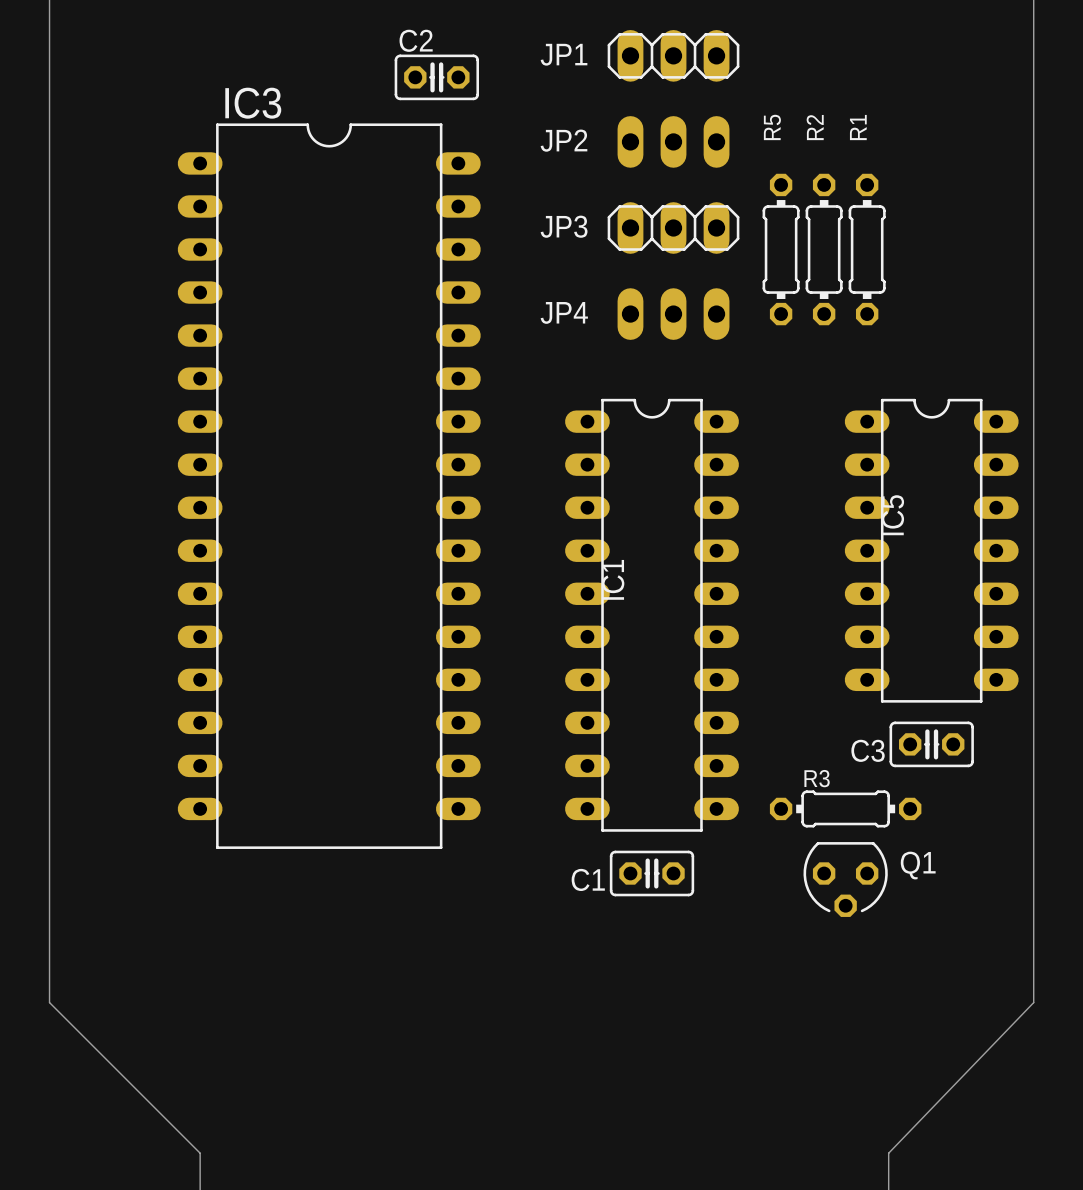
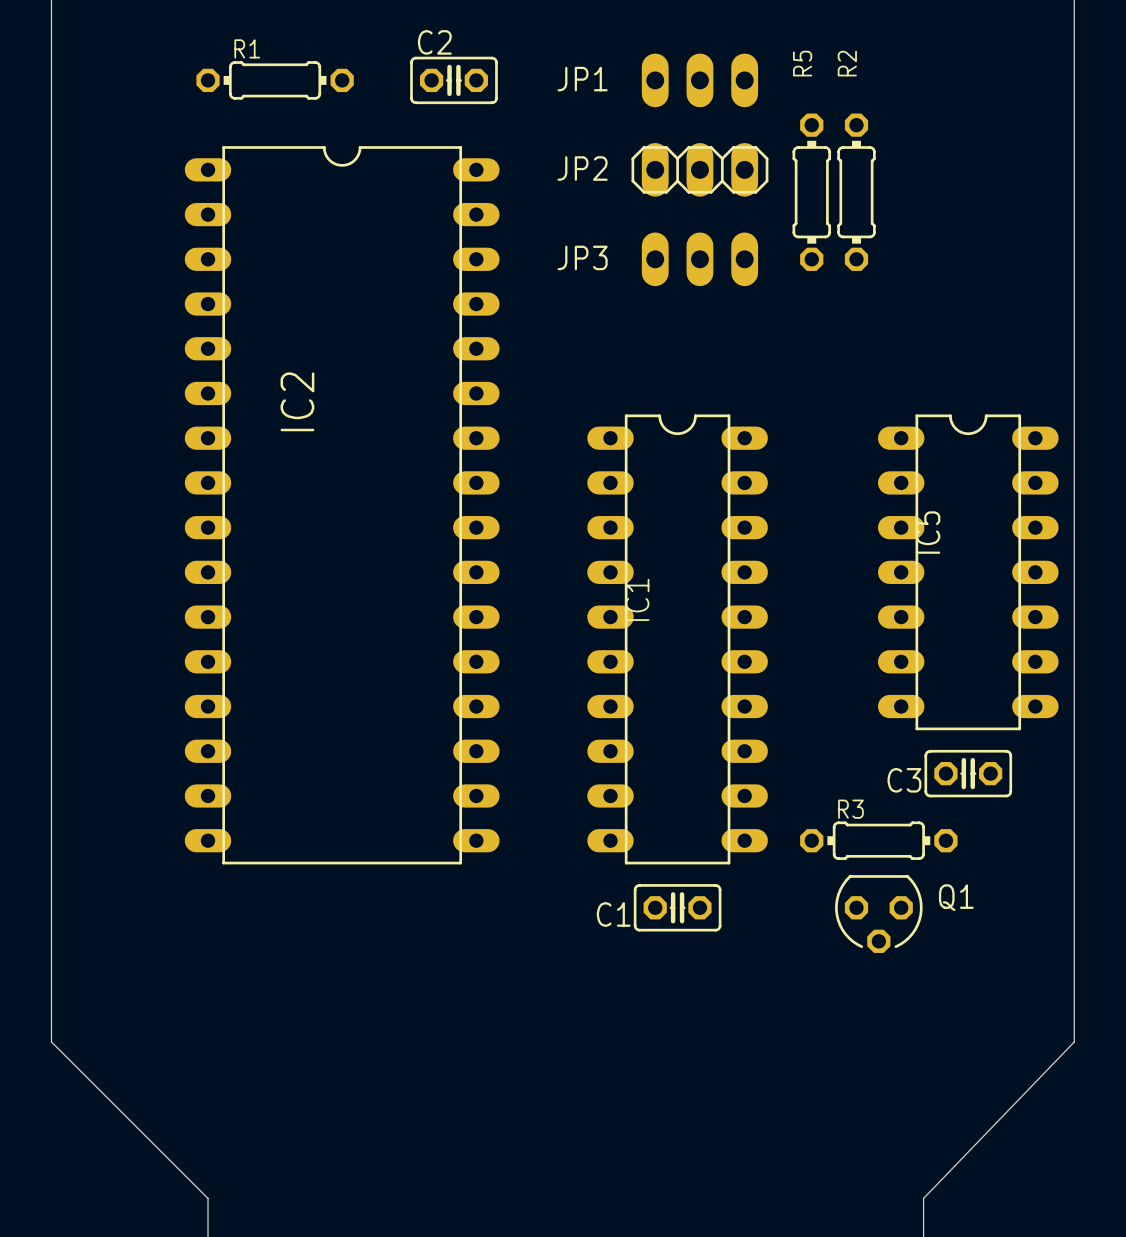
JP1 side: top (673, 55) -> bottom (699, 80)
R1 name position: R1 (858, 127) -> R1 (247, 48)
JP2 side: bottom (673, 141) -> top (699, 169)
JP3 side: top (673, 227) -> bottom (699, 259)
R5 position: (781, 249) -> (811, 192)
R2 position: (824, 249) -> (856, 192)
R1 rotation: 0° (867, 249) -> 90° clockwise (275, 80)
R1 position: (867, 249) -> (275, 80)
JP4: (673, 314) -> none
IC3: (329, 486) -> none
IC2: none -> (342, 505)

